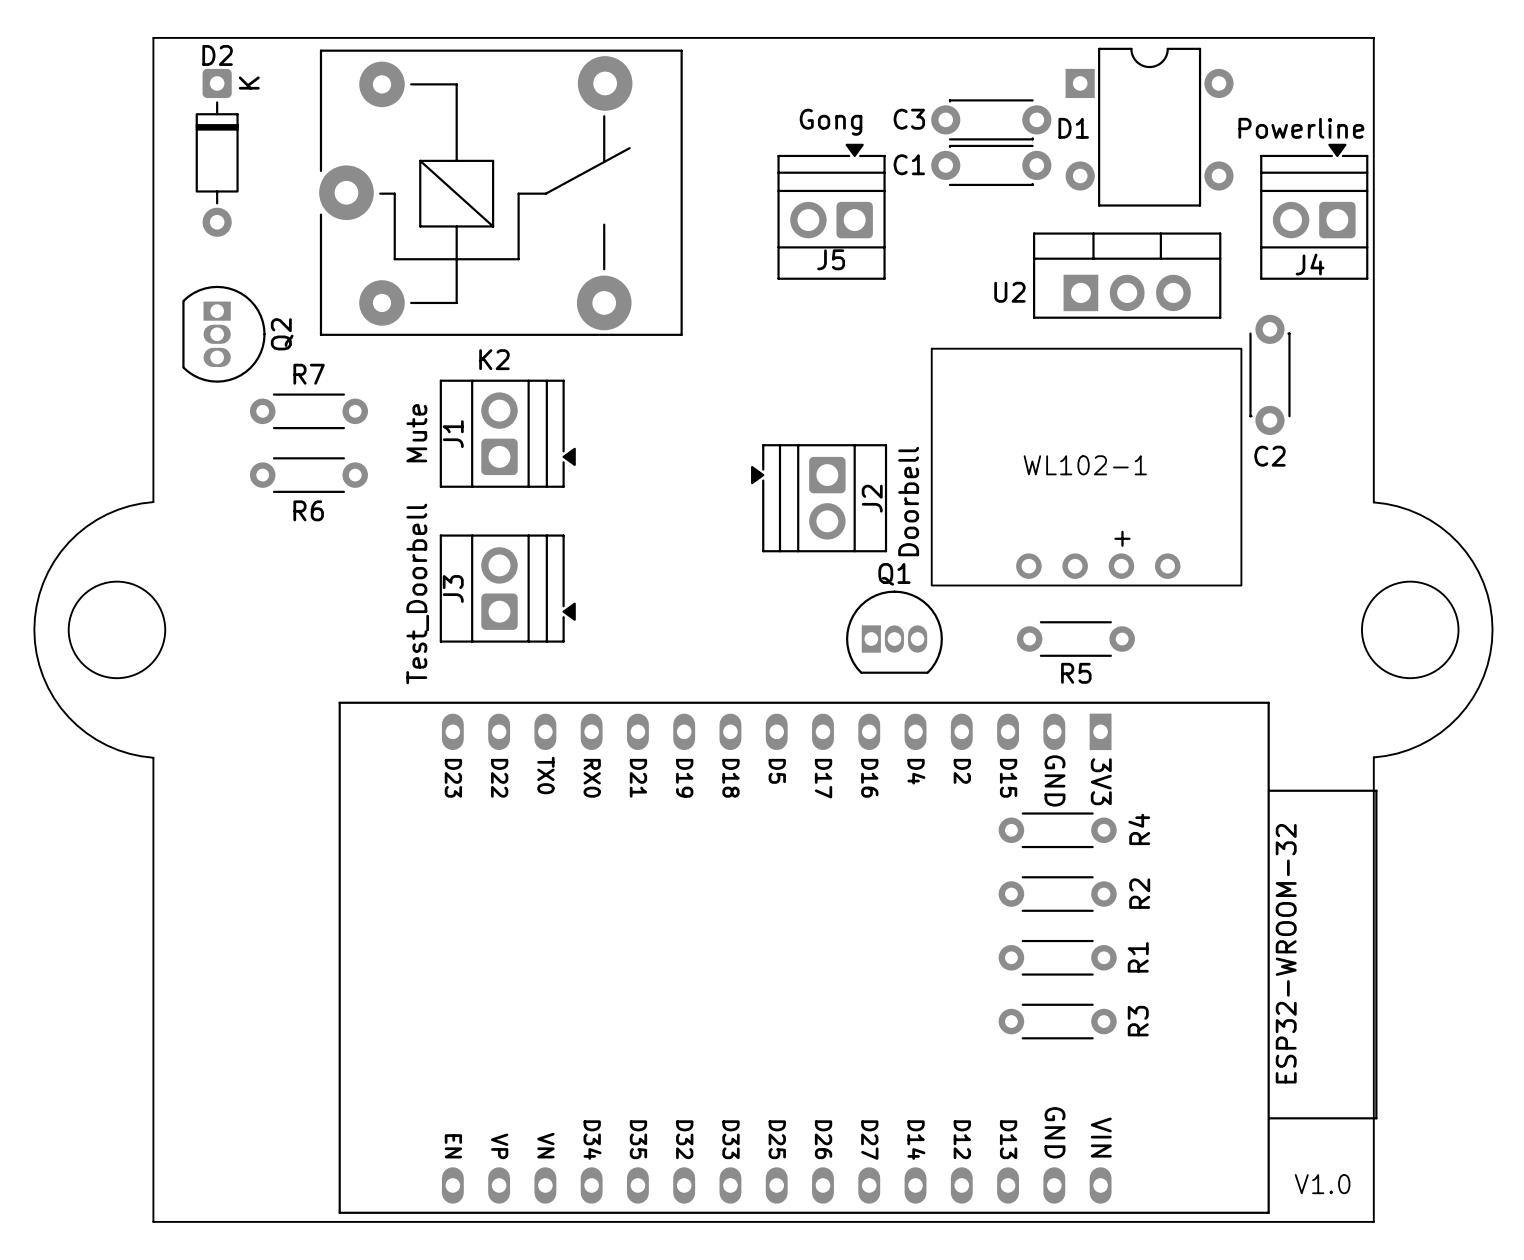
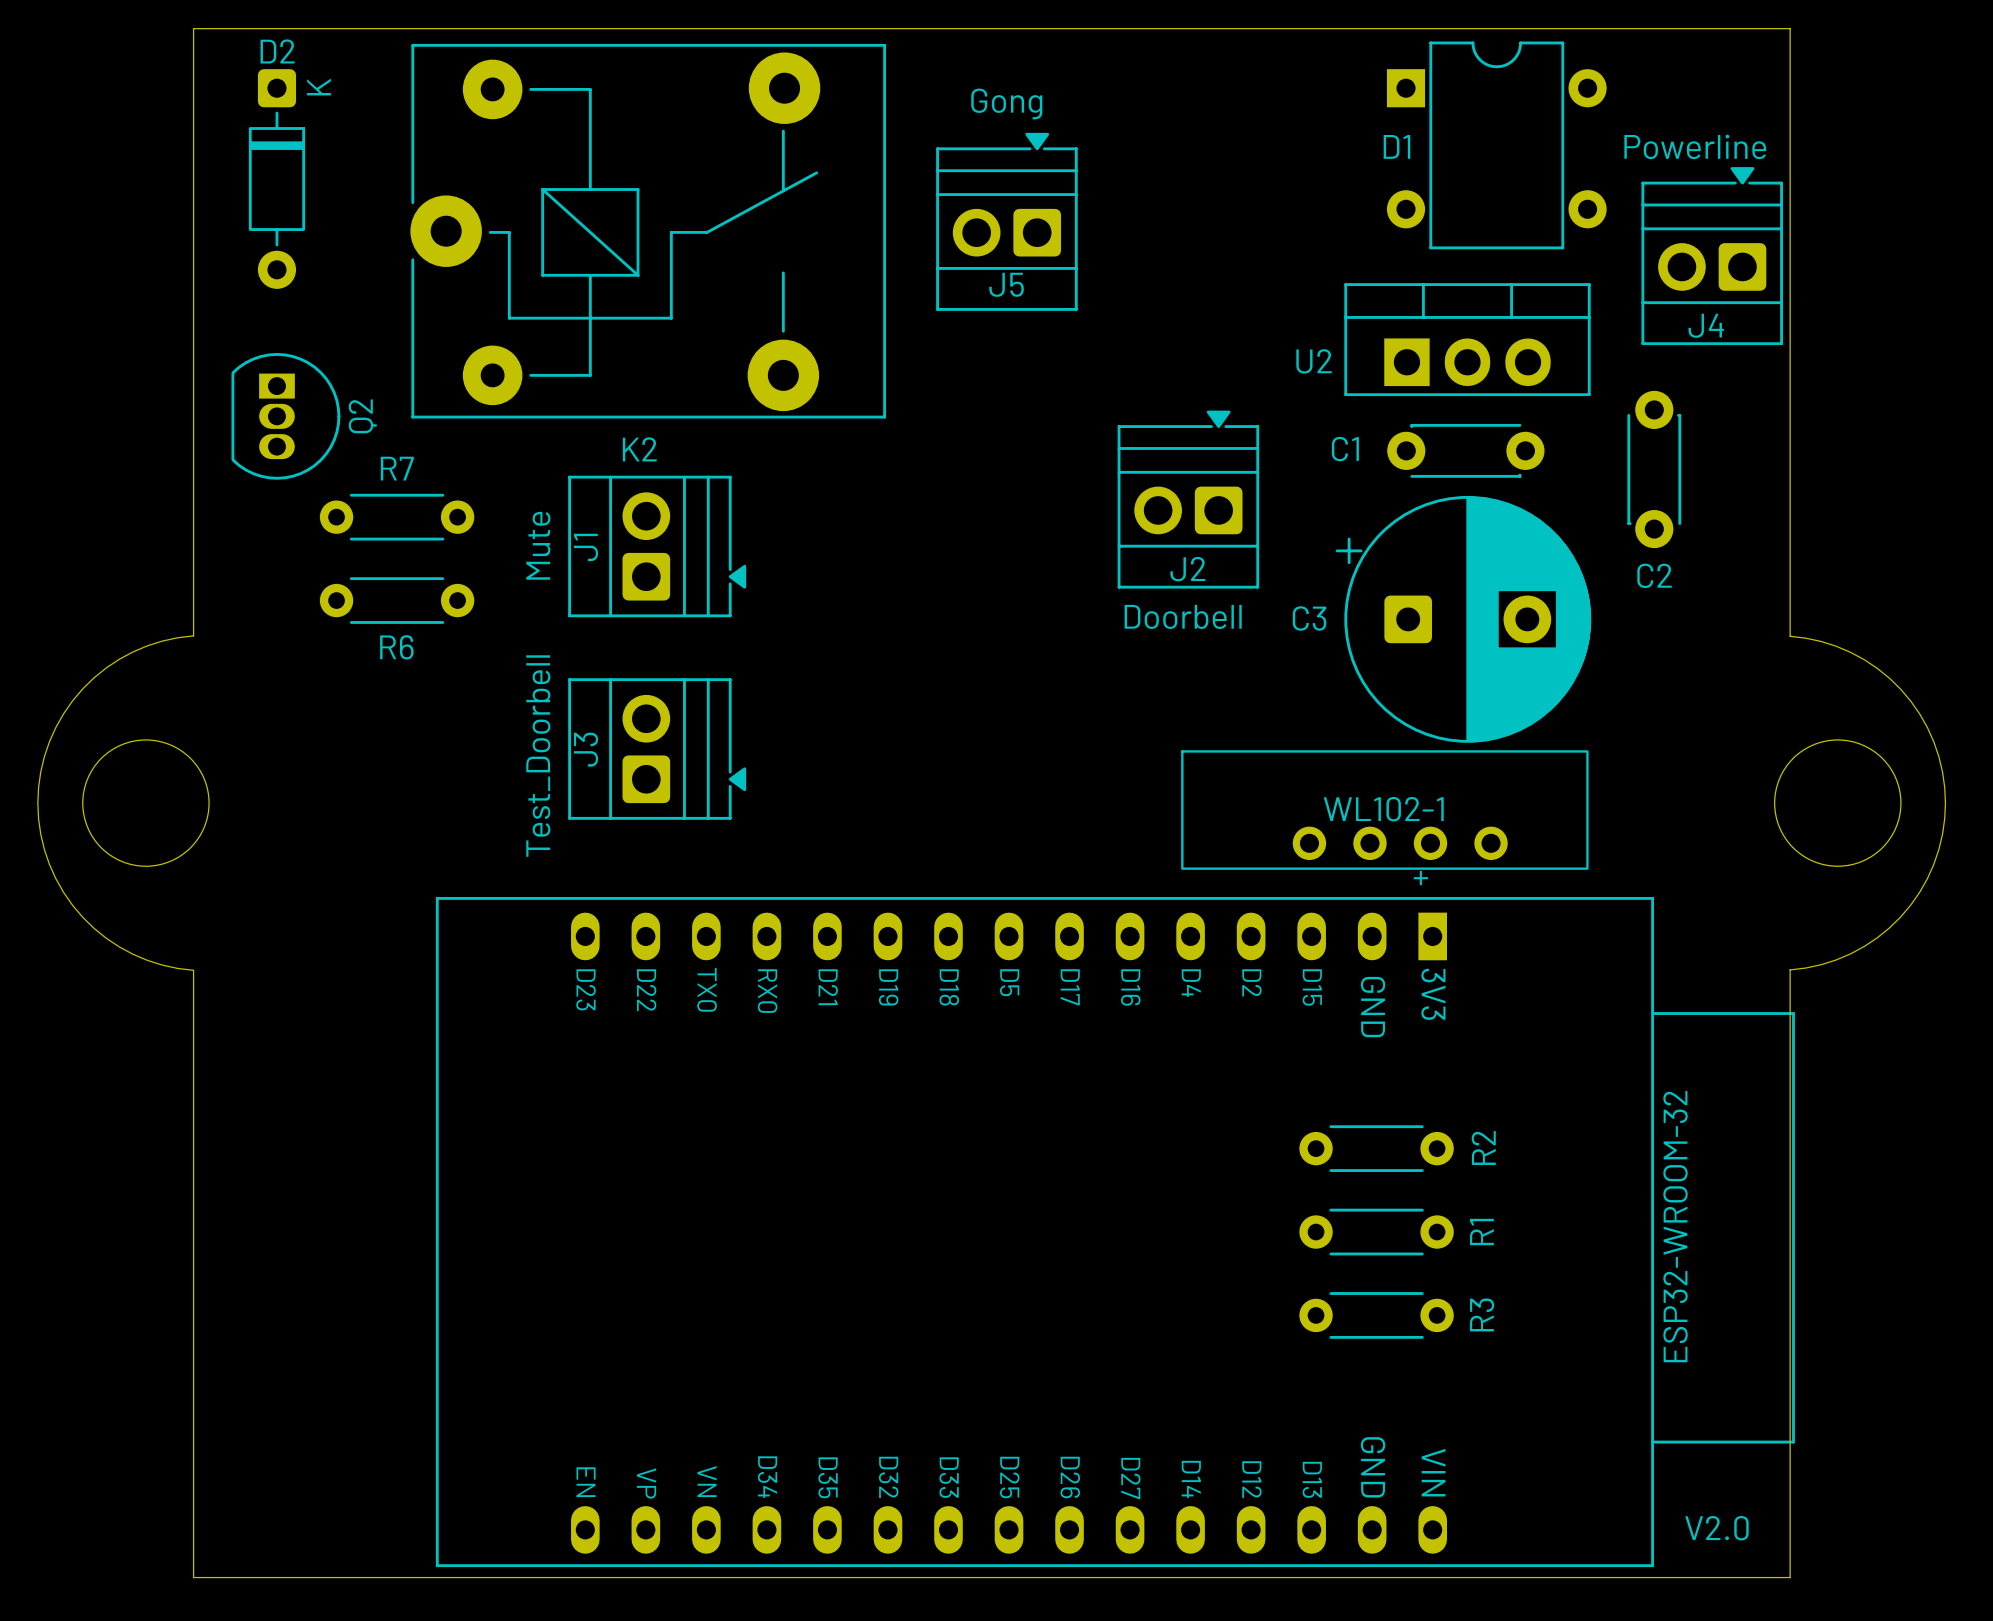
C3 footprint: [931, 99, 1052, 141] -> [1335, 495, 1592, 743]
C1 name position: C1 (909, 164) -> C1 (1345, 449)
C1 position: (991, 165) -> (1465, 450)
J5 position: (831, 211) -> (1006, 221)
WL102-1 footprint: [930, 347, 1243, 587] -> [1181, 750, 1589, 870]
J2 rotation: 0° (819, 498) -> 90° clockwise (1188, 499)
J2 position: (819, 498) -> (1188, 499)
text position: + (1122, 538) -> + (1420, 878)
Q1: (894, 632) -> none
R5: (1075, 639) -> none
R4: (1057, 830) -> none
text: V1.0 (1322, 1184) -> V2.0 (1716, 1528)

